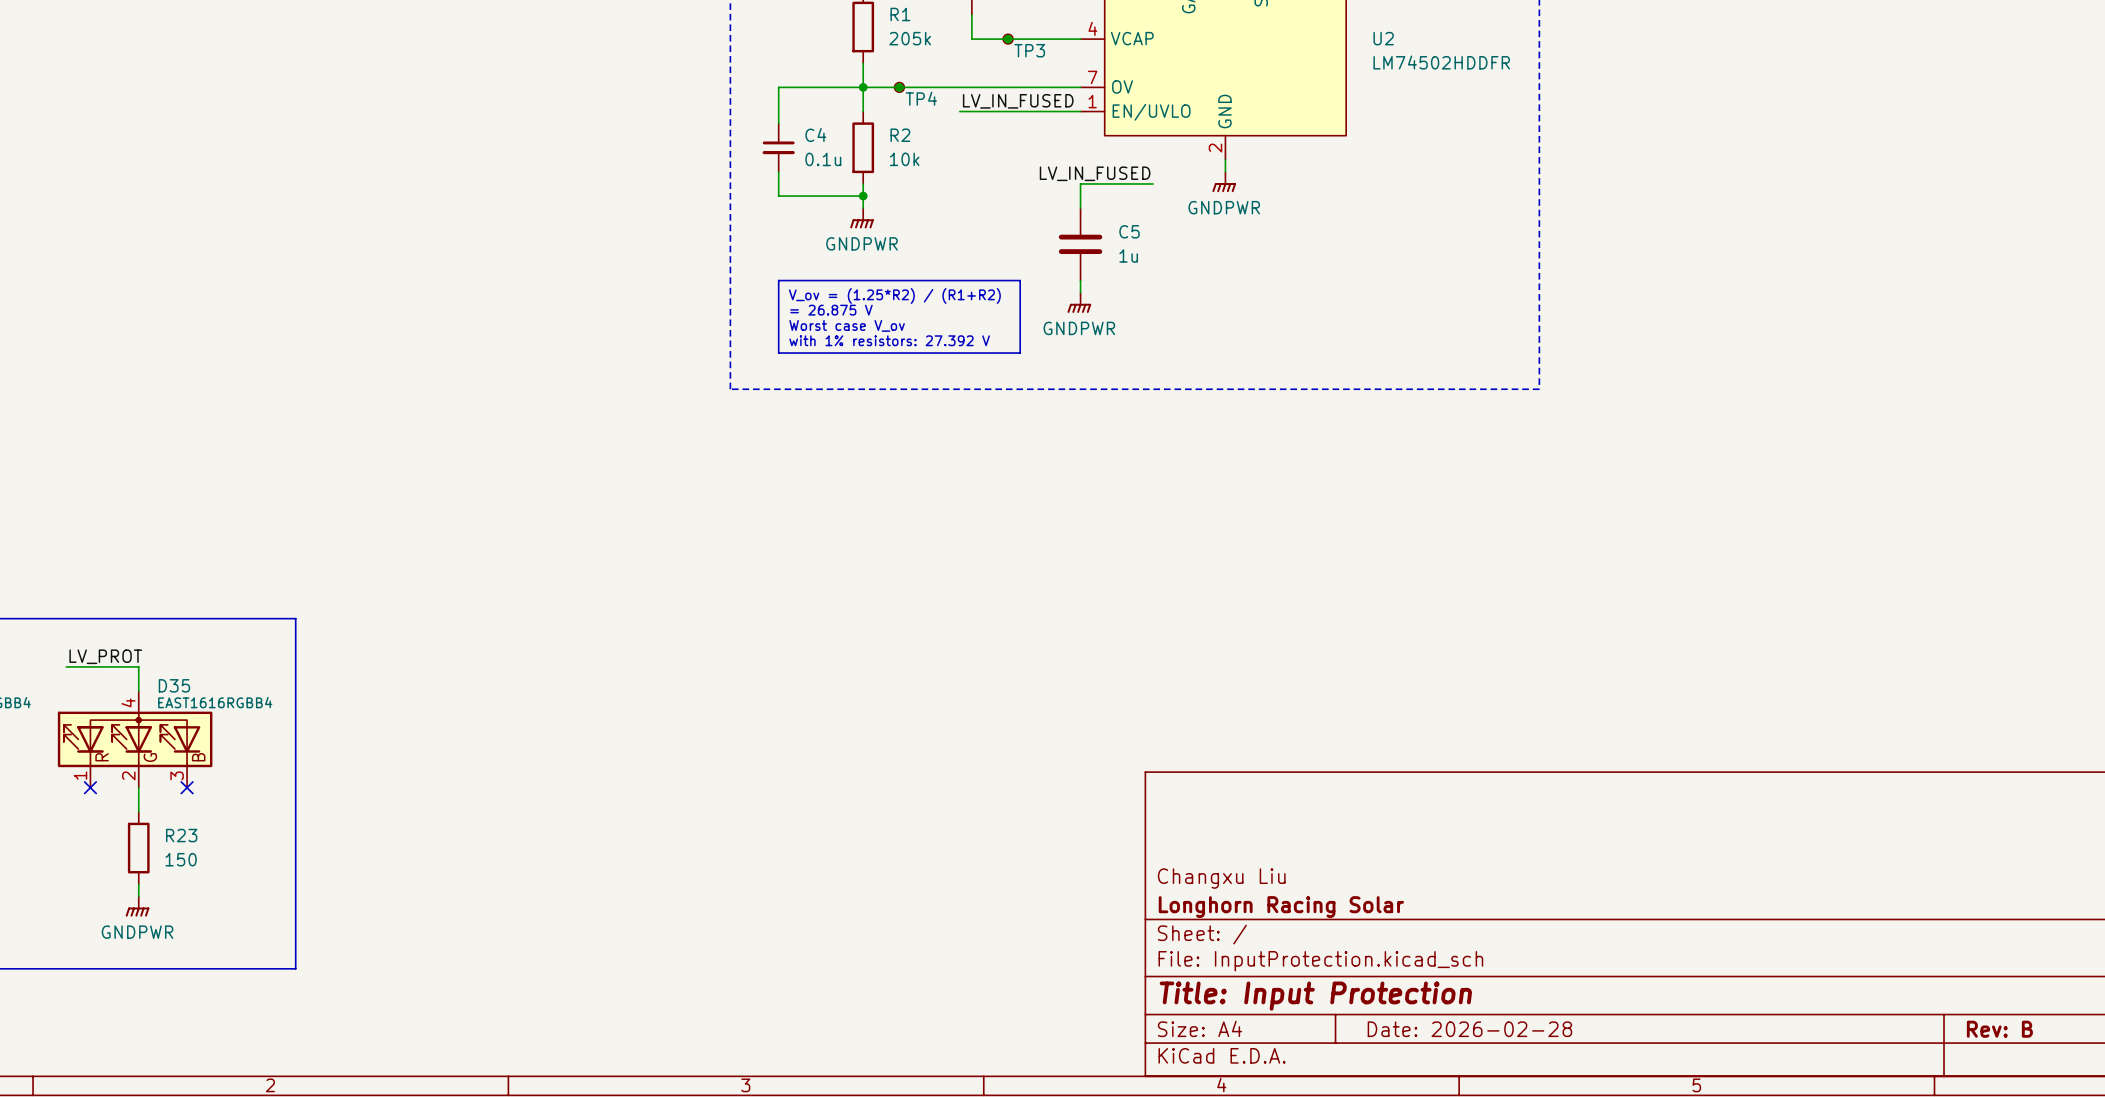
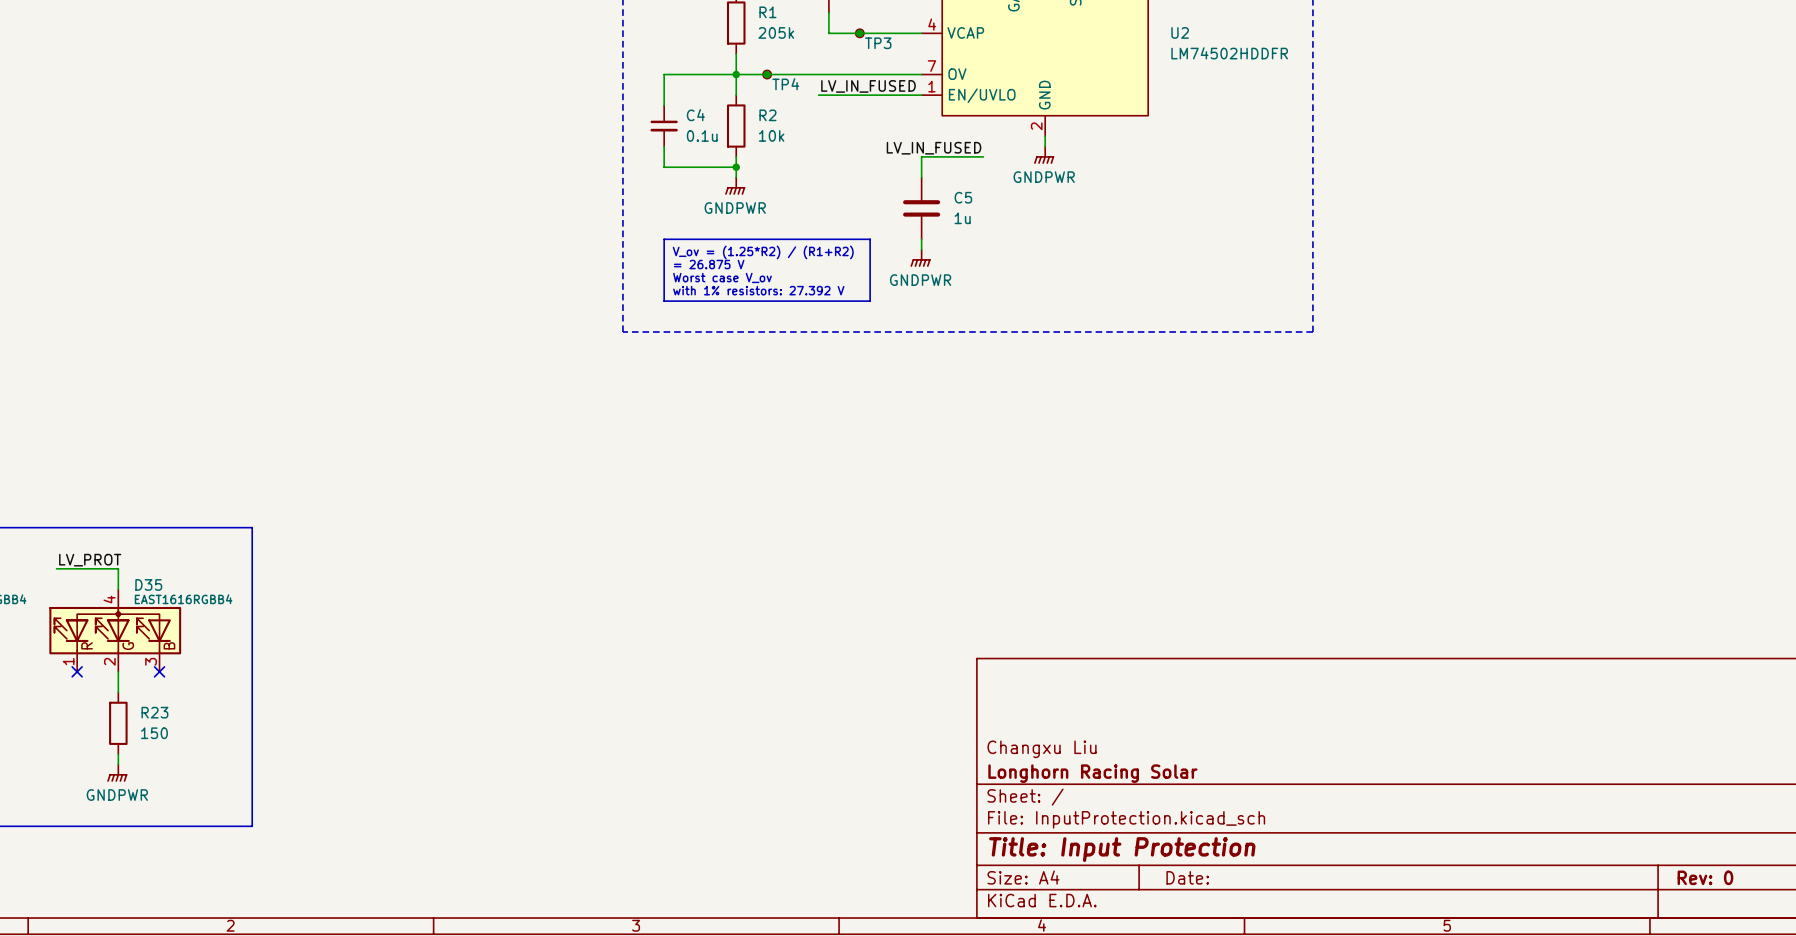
title block: Date: 2026-02-28 (1469, 1029) -> Date: (1187, 877)
title block: Rev: B (1999, 1029) -> Rev: 0 (1705, 877)

